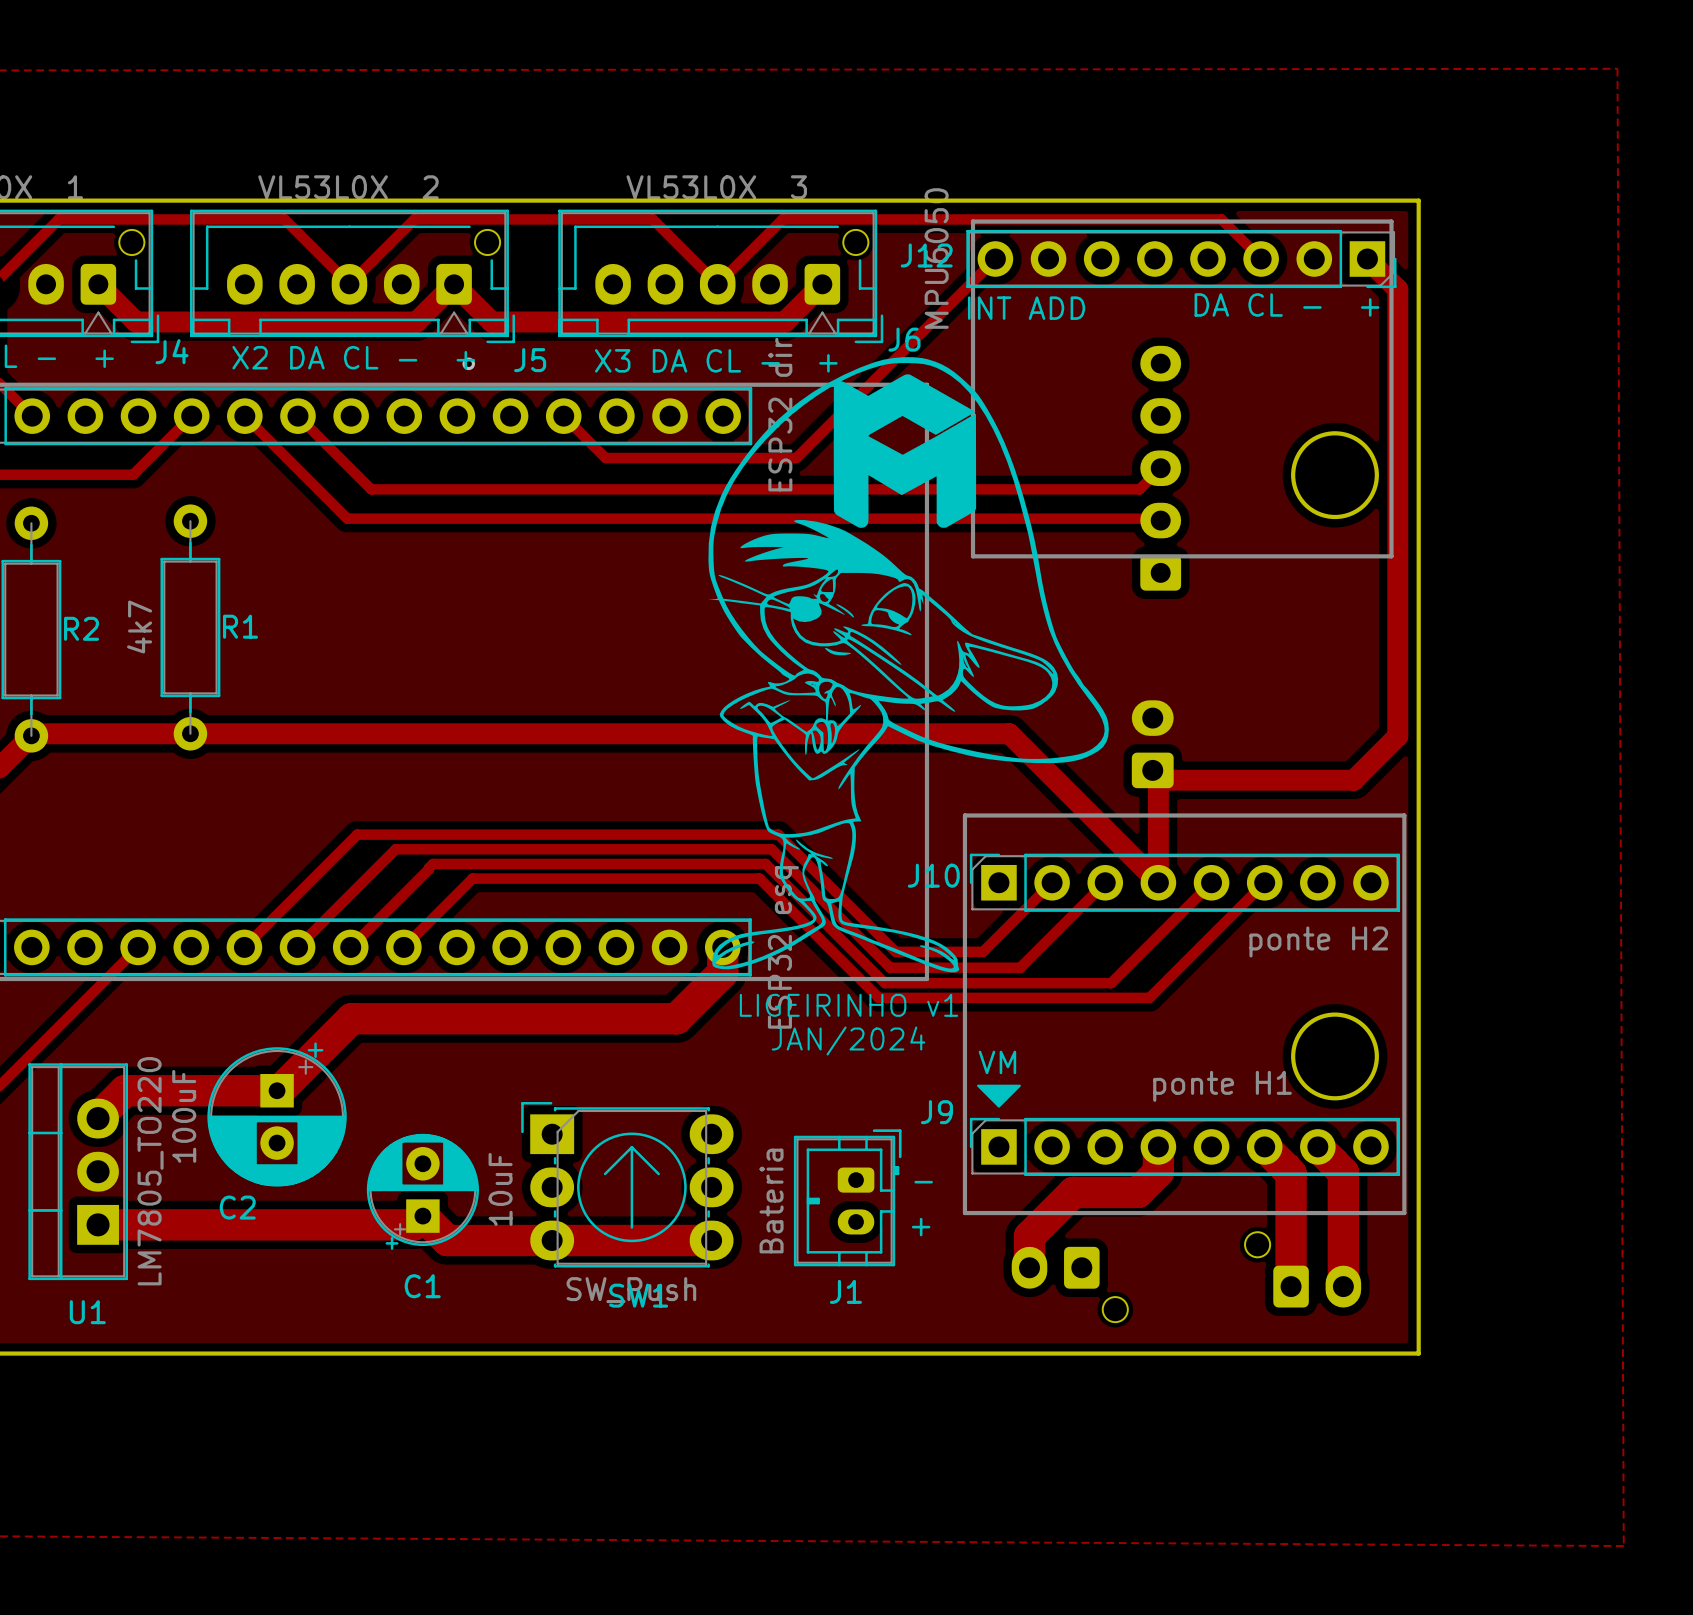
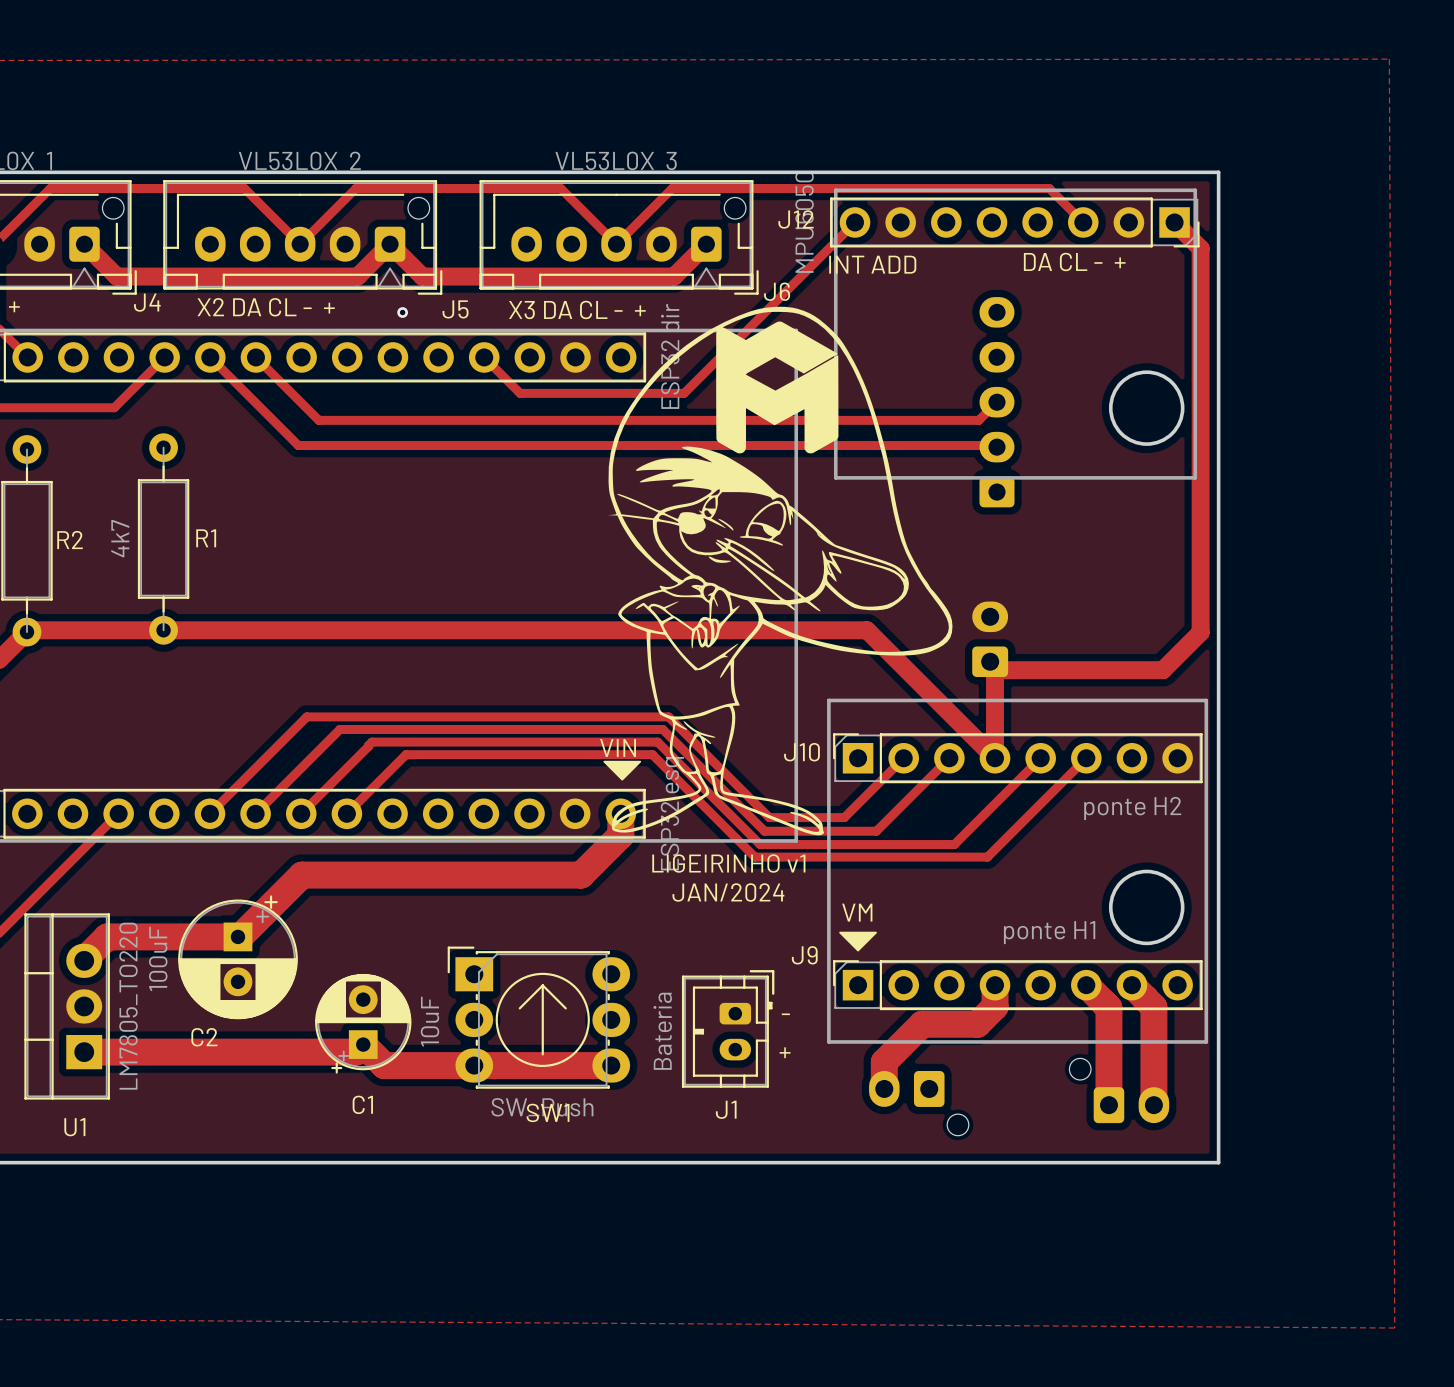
text: none -> VIN (618, 747)
drawing: none -> [603, 760, 642, 781]

